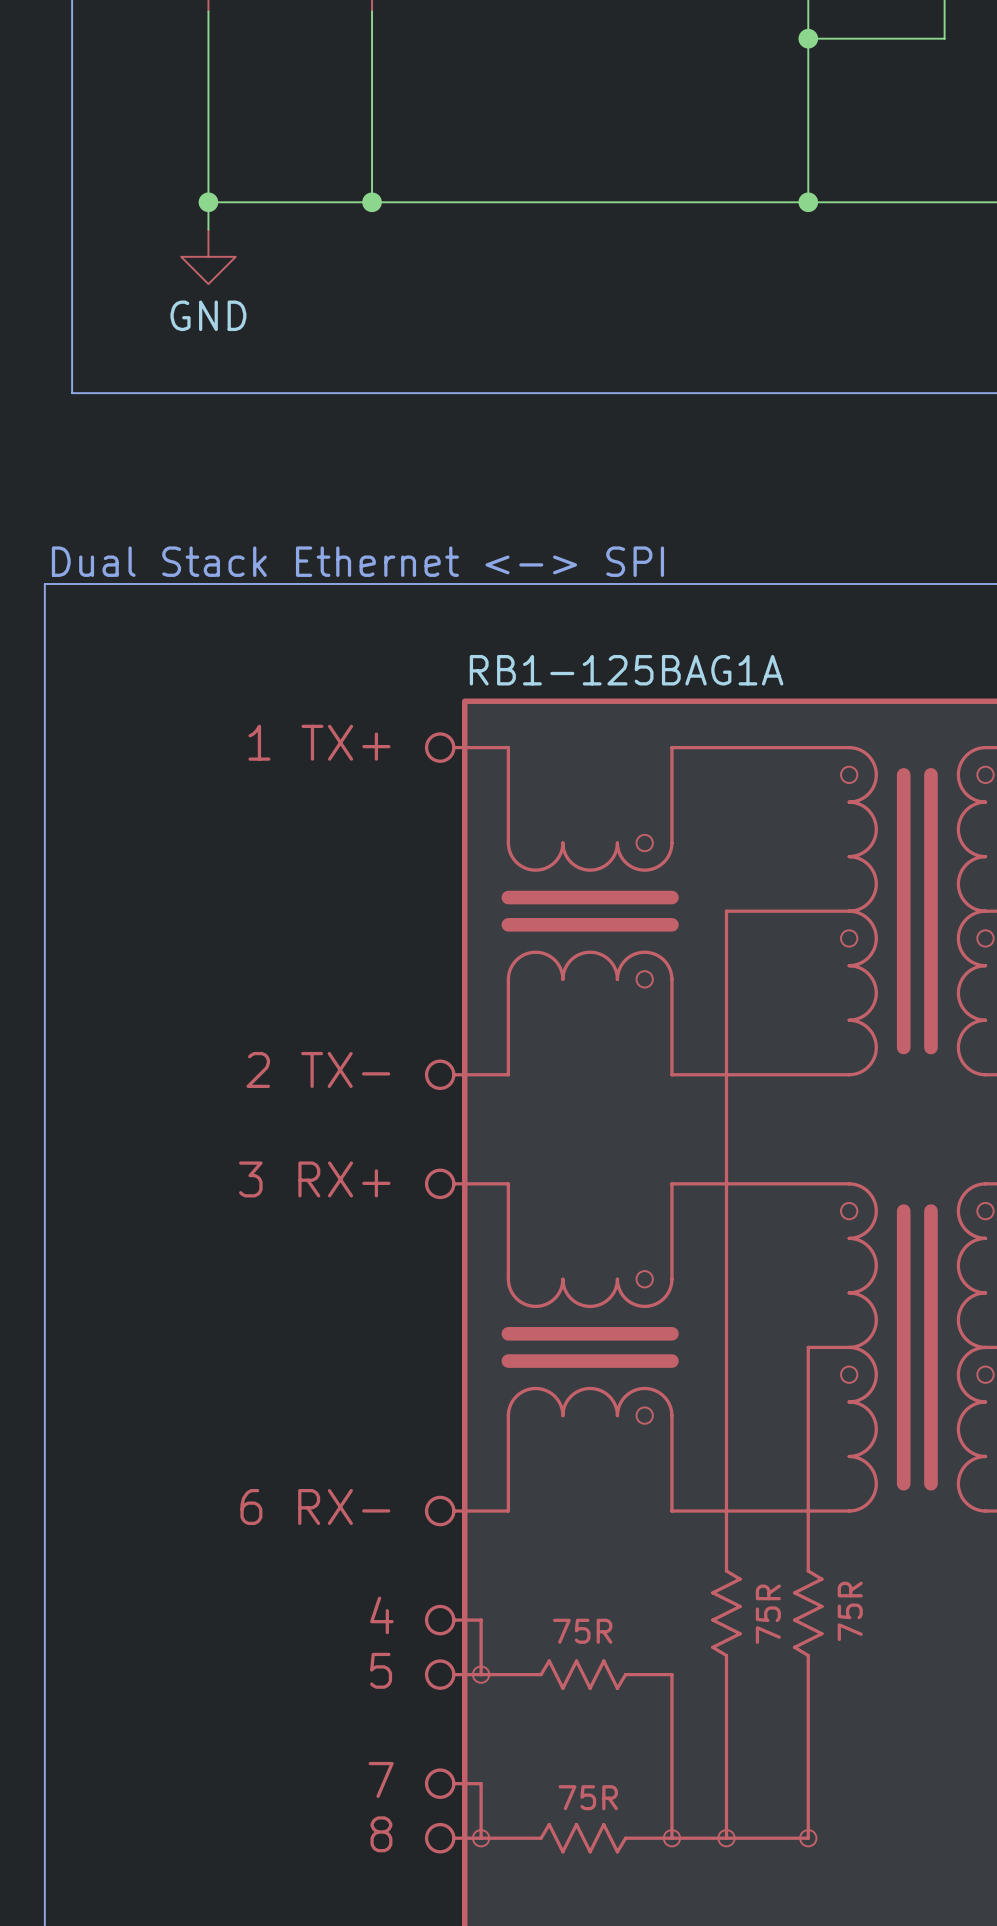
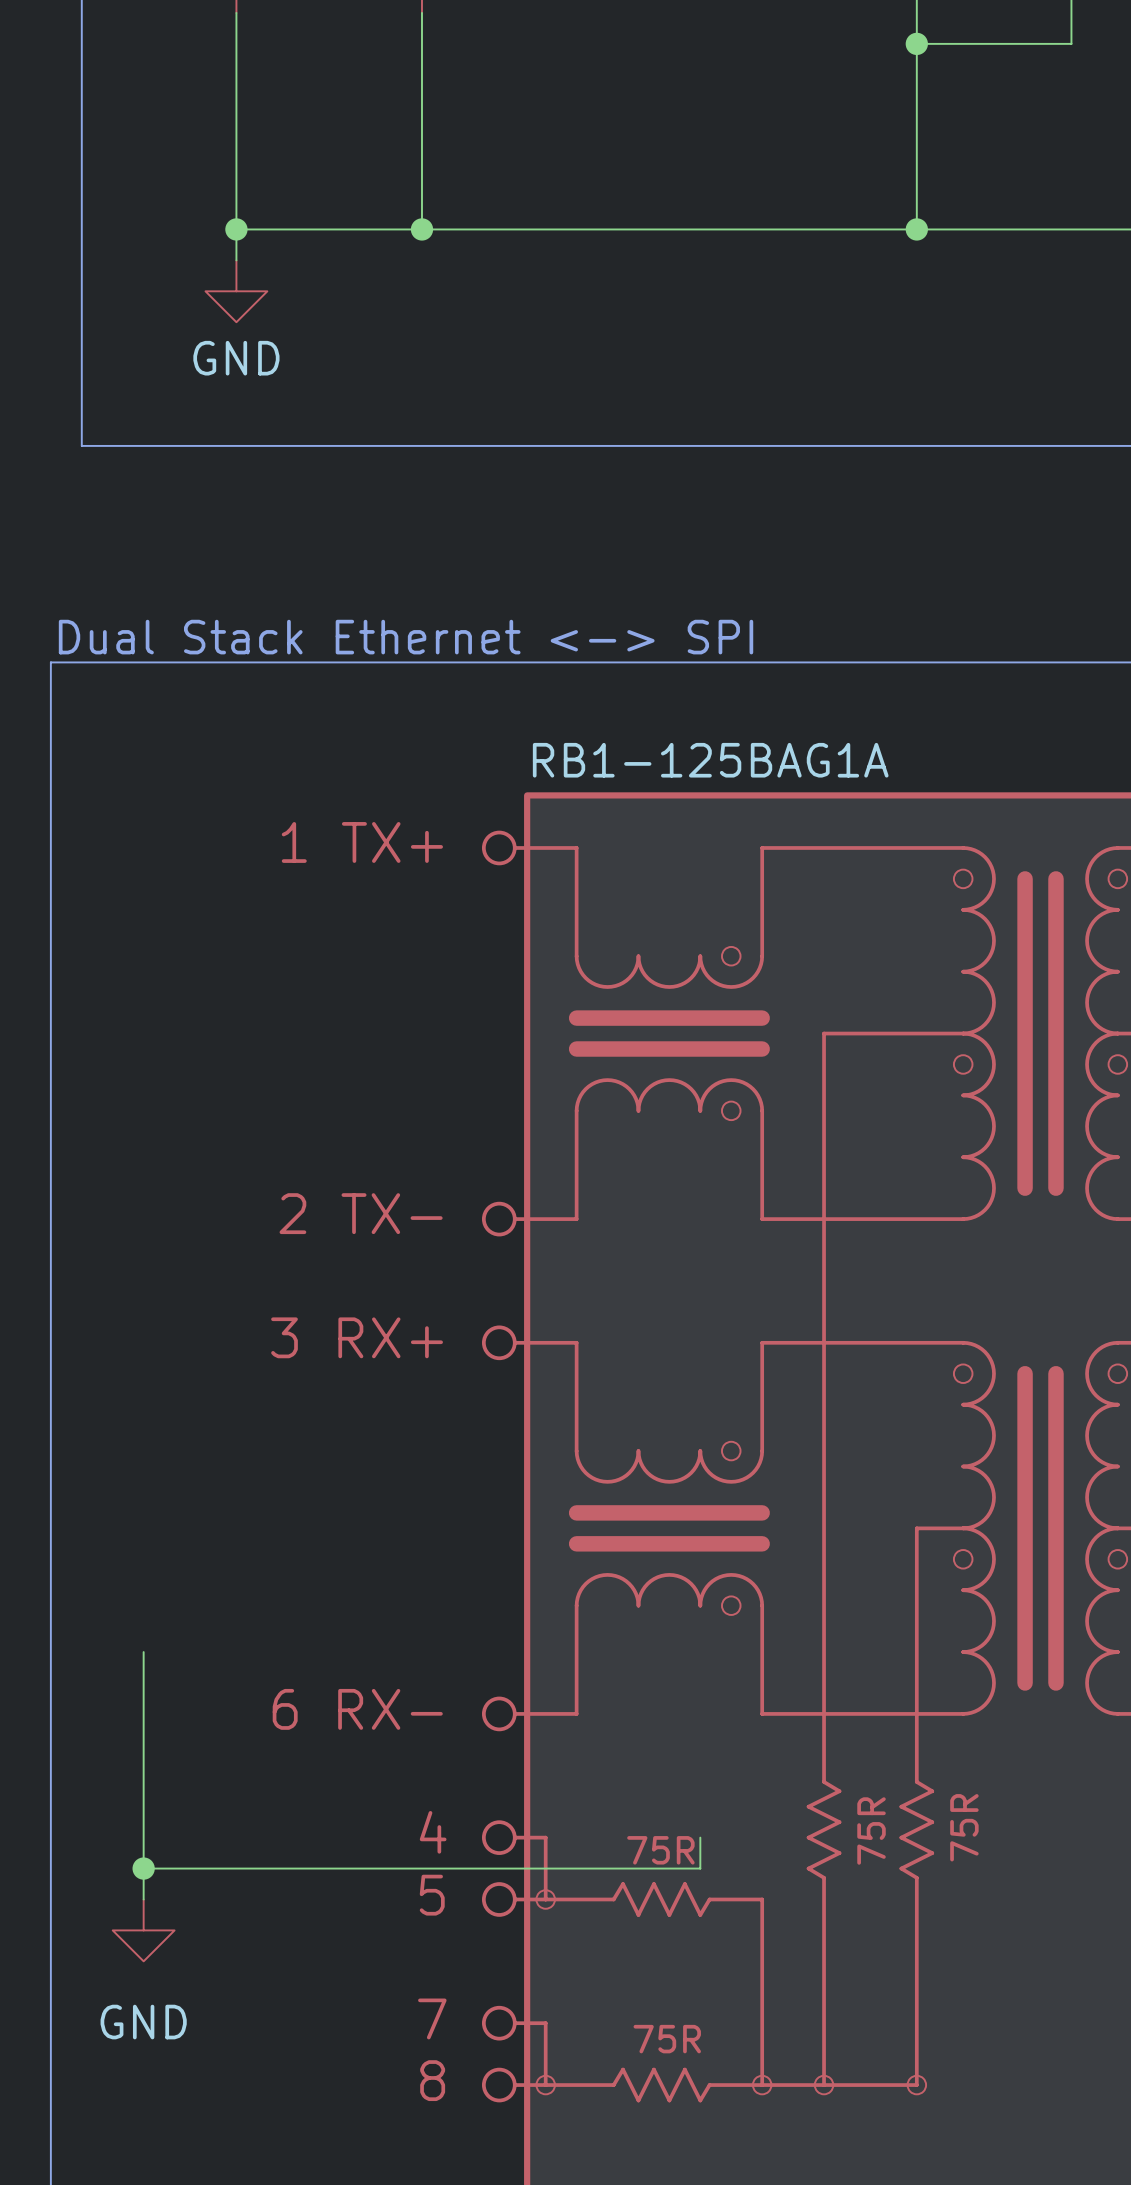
wire: none -> (143, 1652) (143, 1899)
wire: none -> (700, 1837) (700, 1868) (143, 1868)
junction: none -> (143, 1868)
power symbol: none -> GND (143, 1930)

